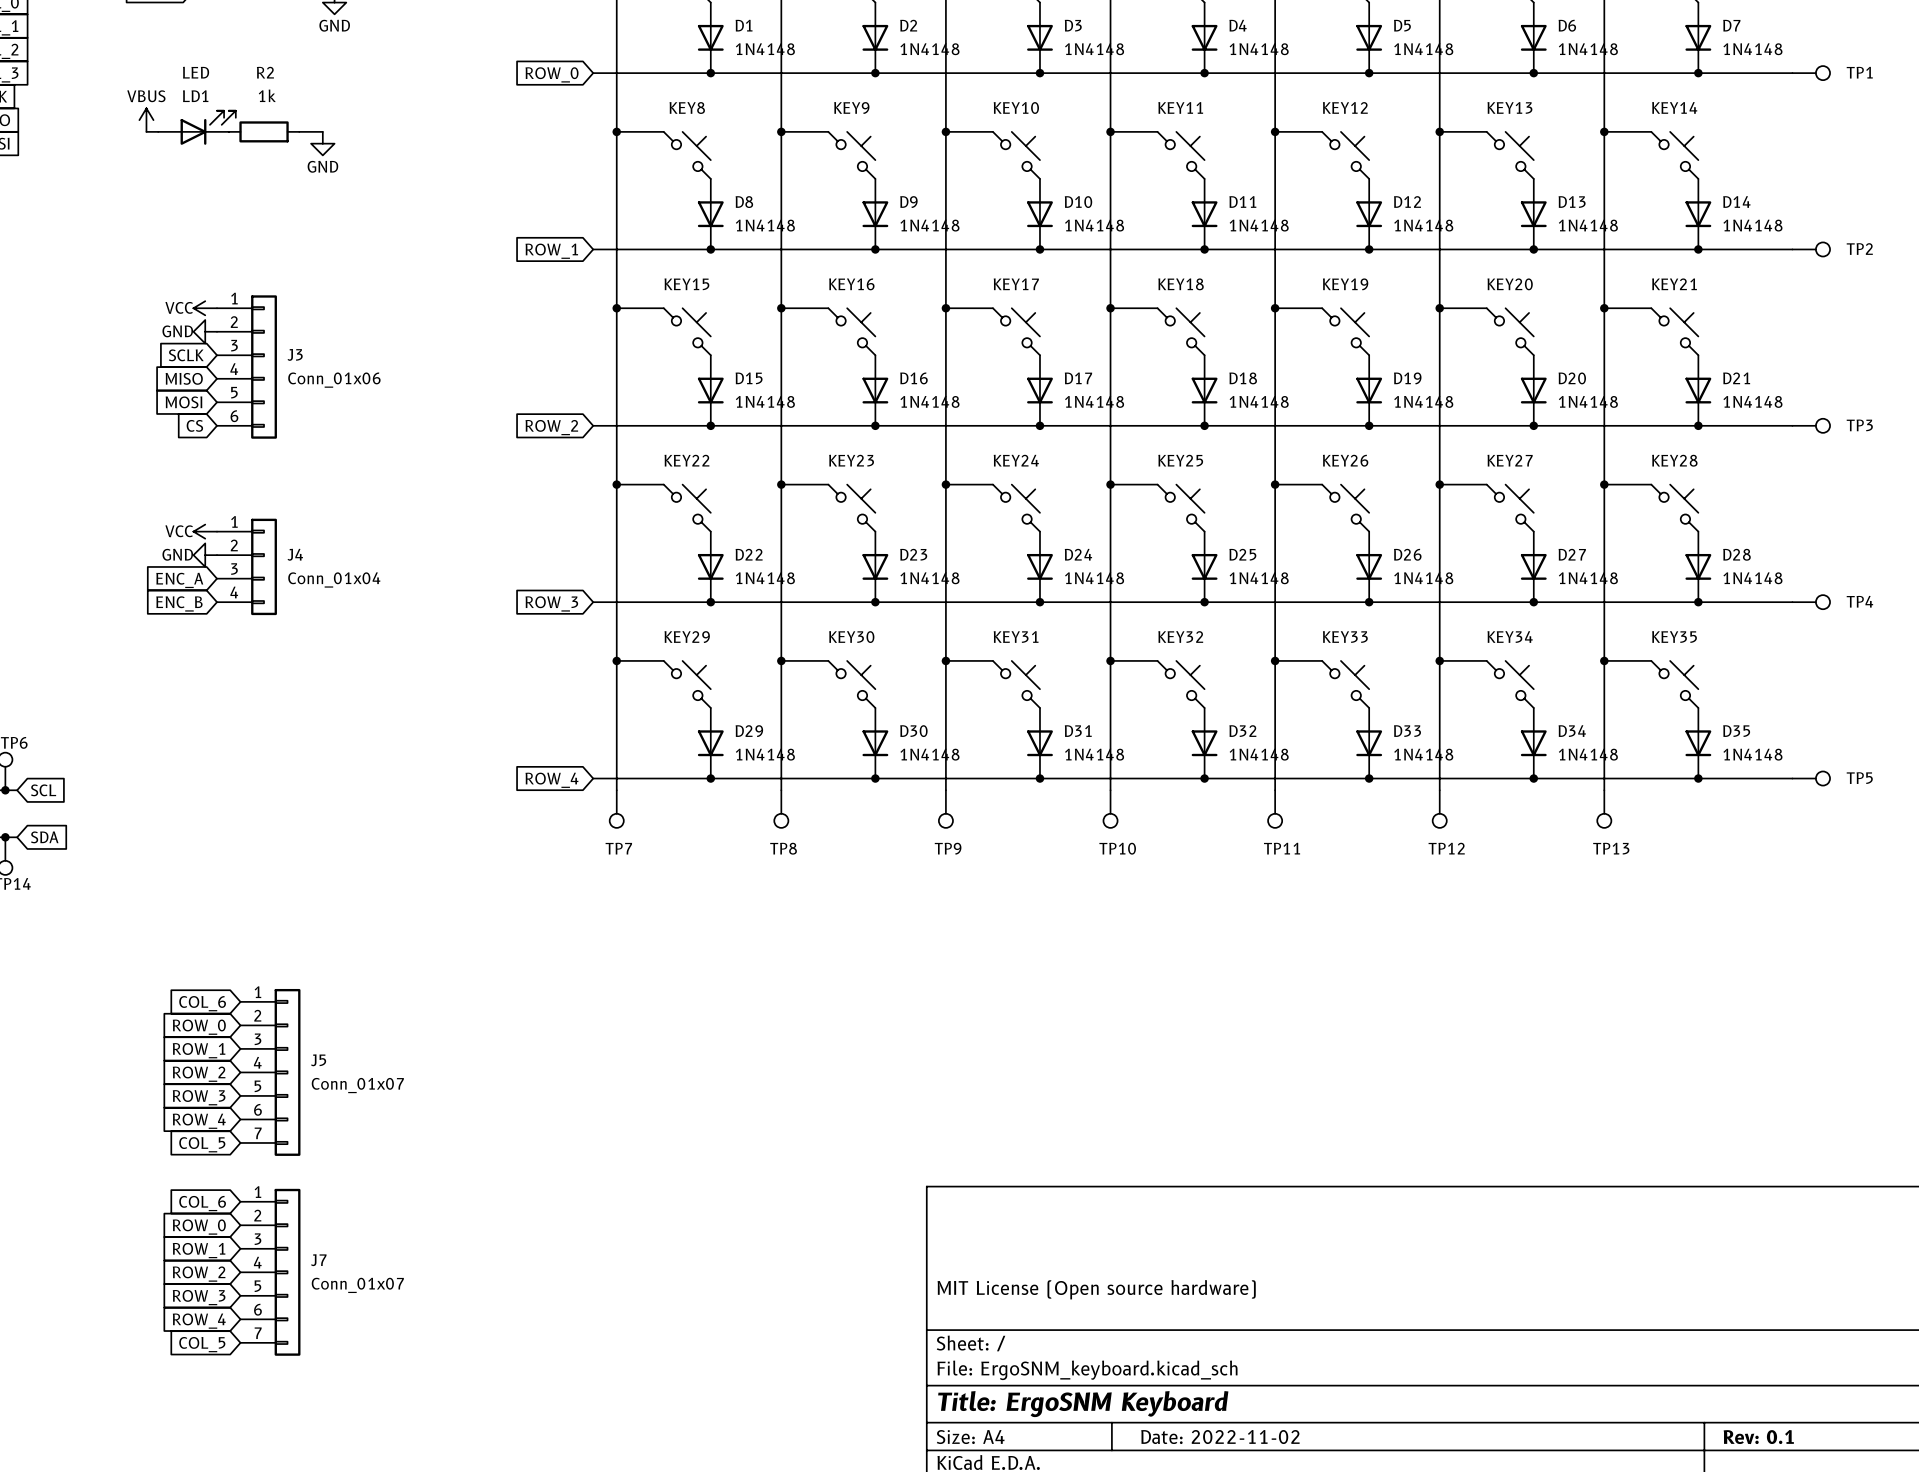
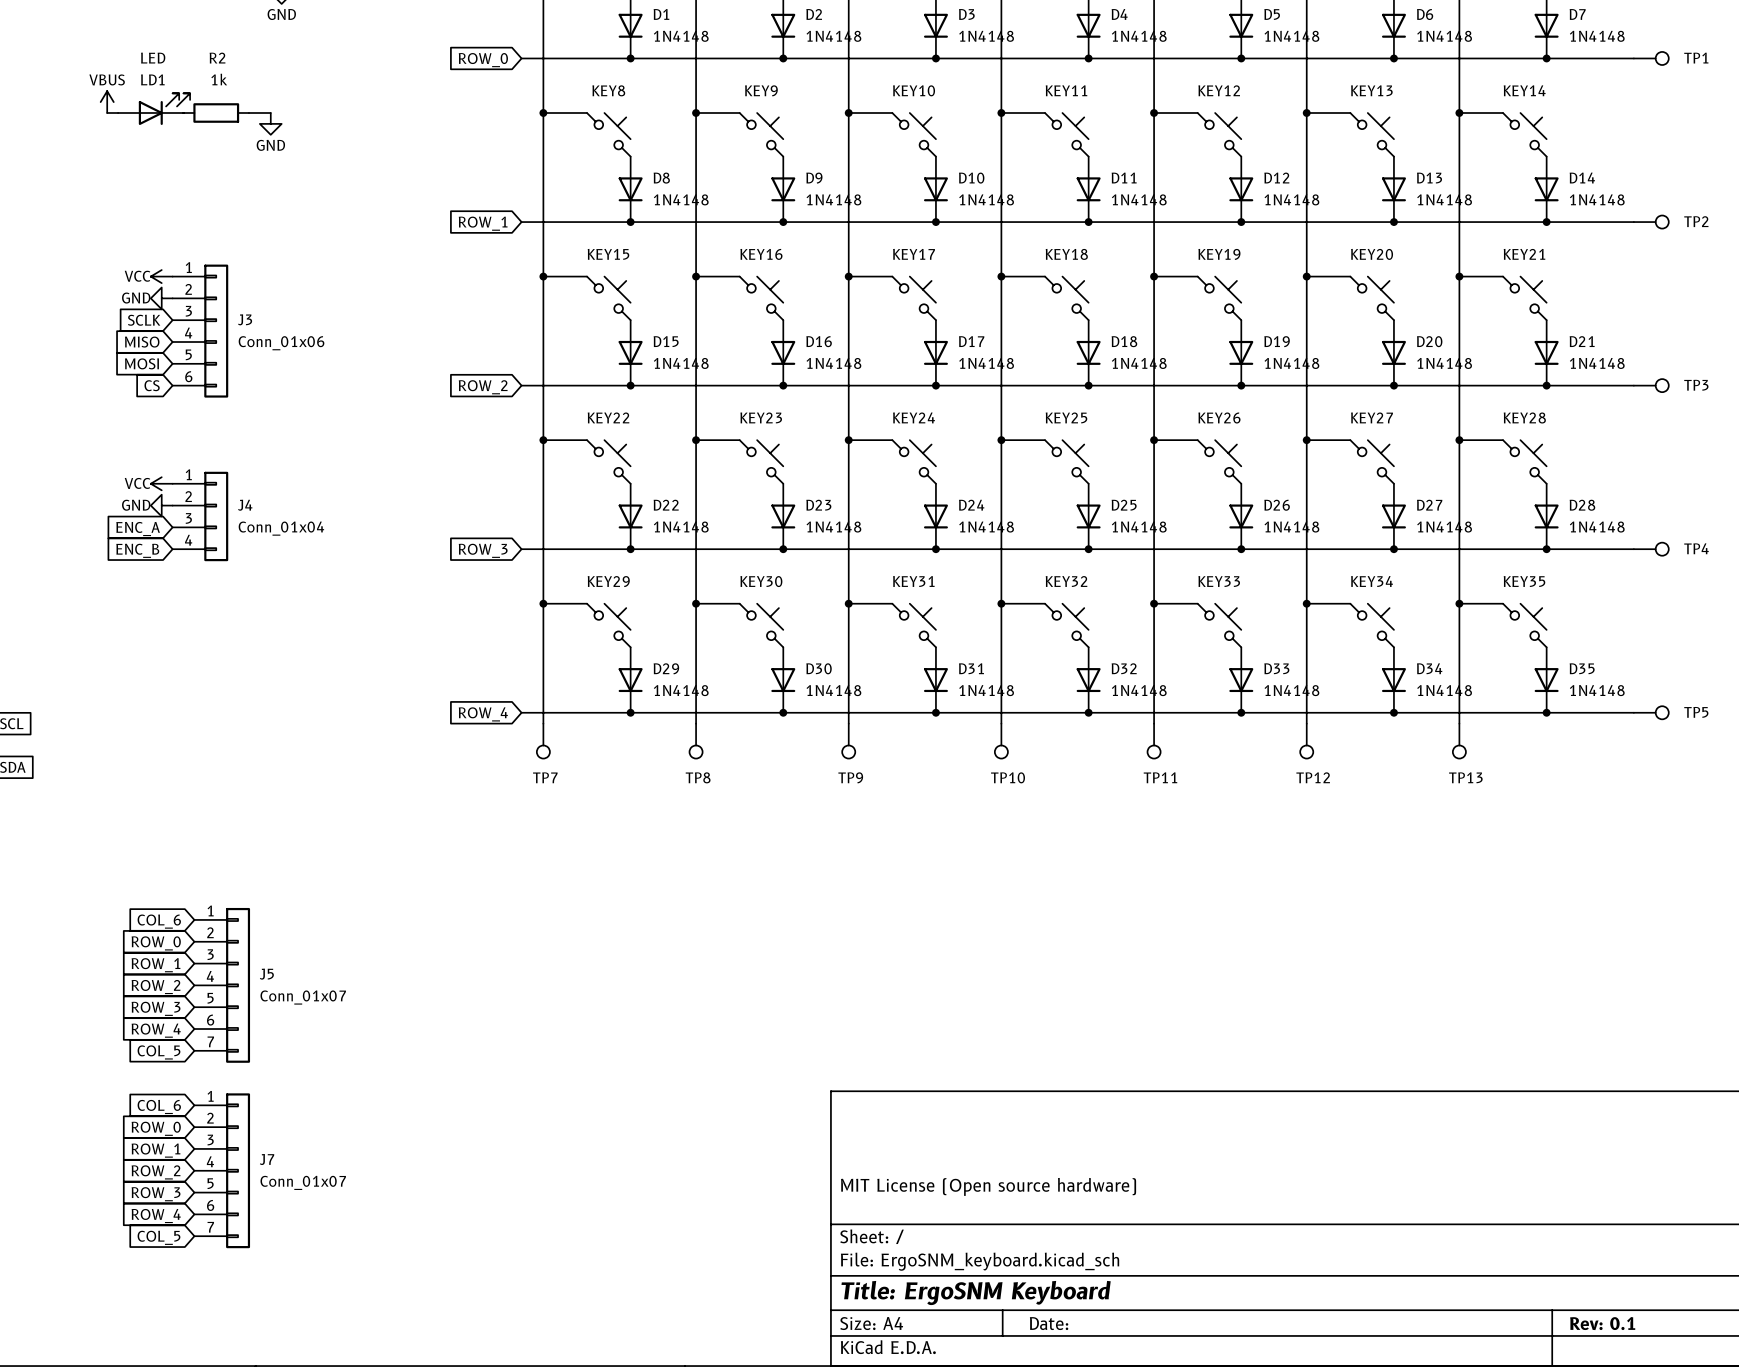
title block: Date: 2022-11-02 (1220, 1437) -> Date: (1049, 1323)

